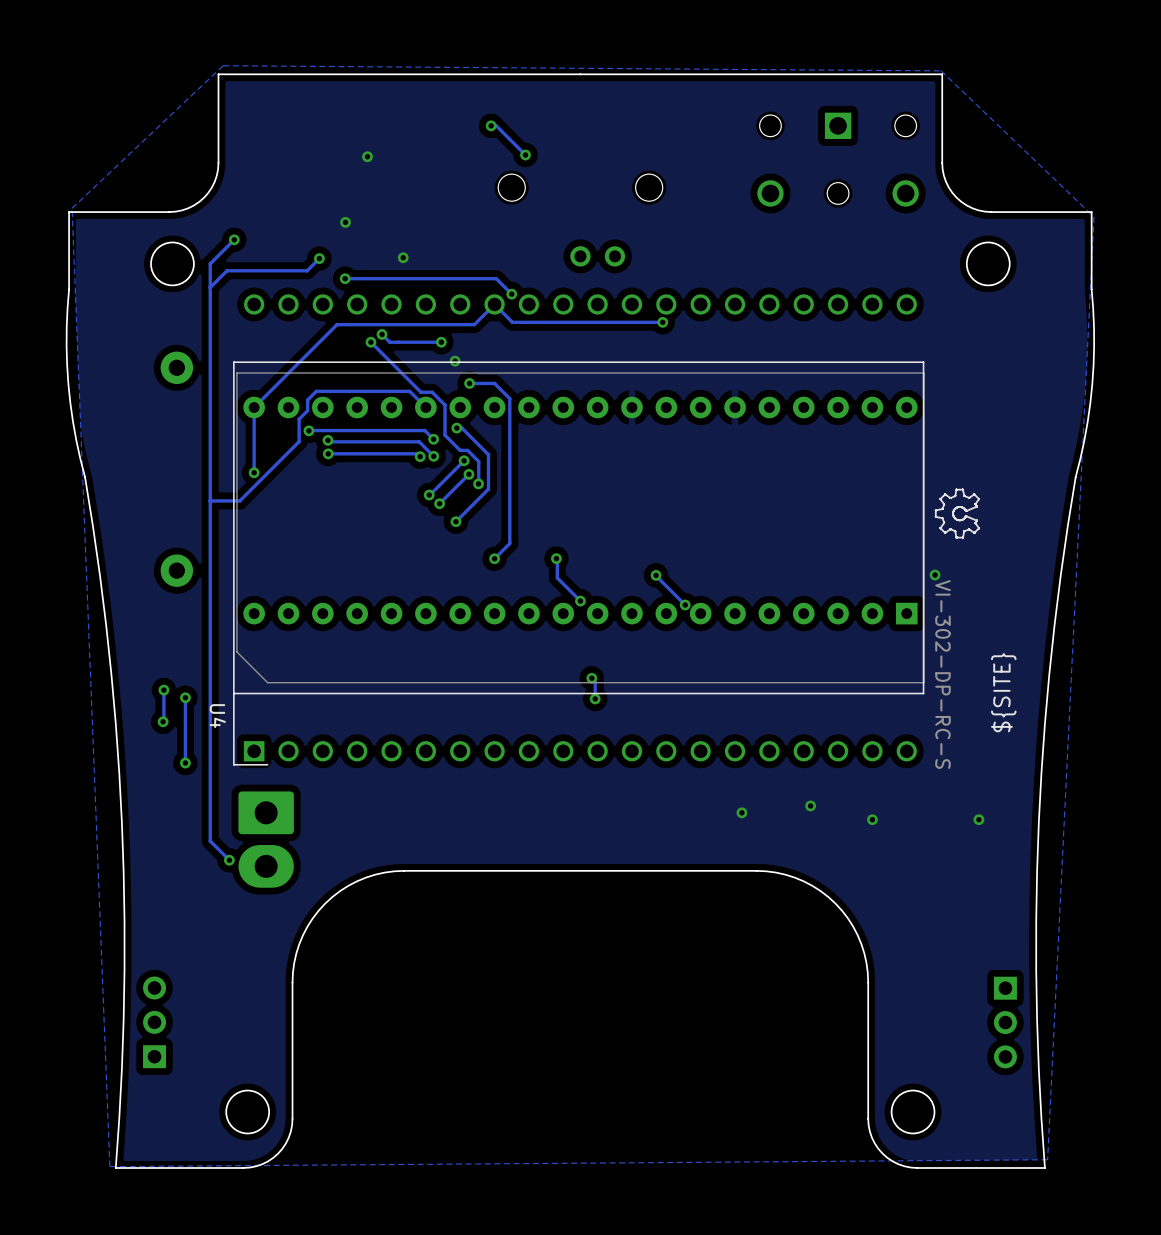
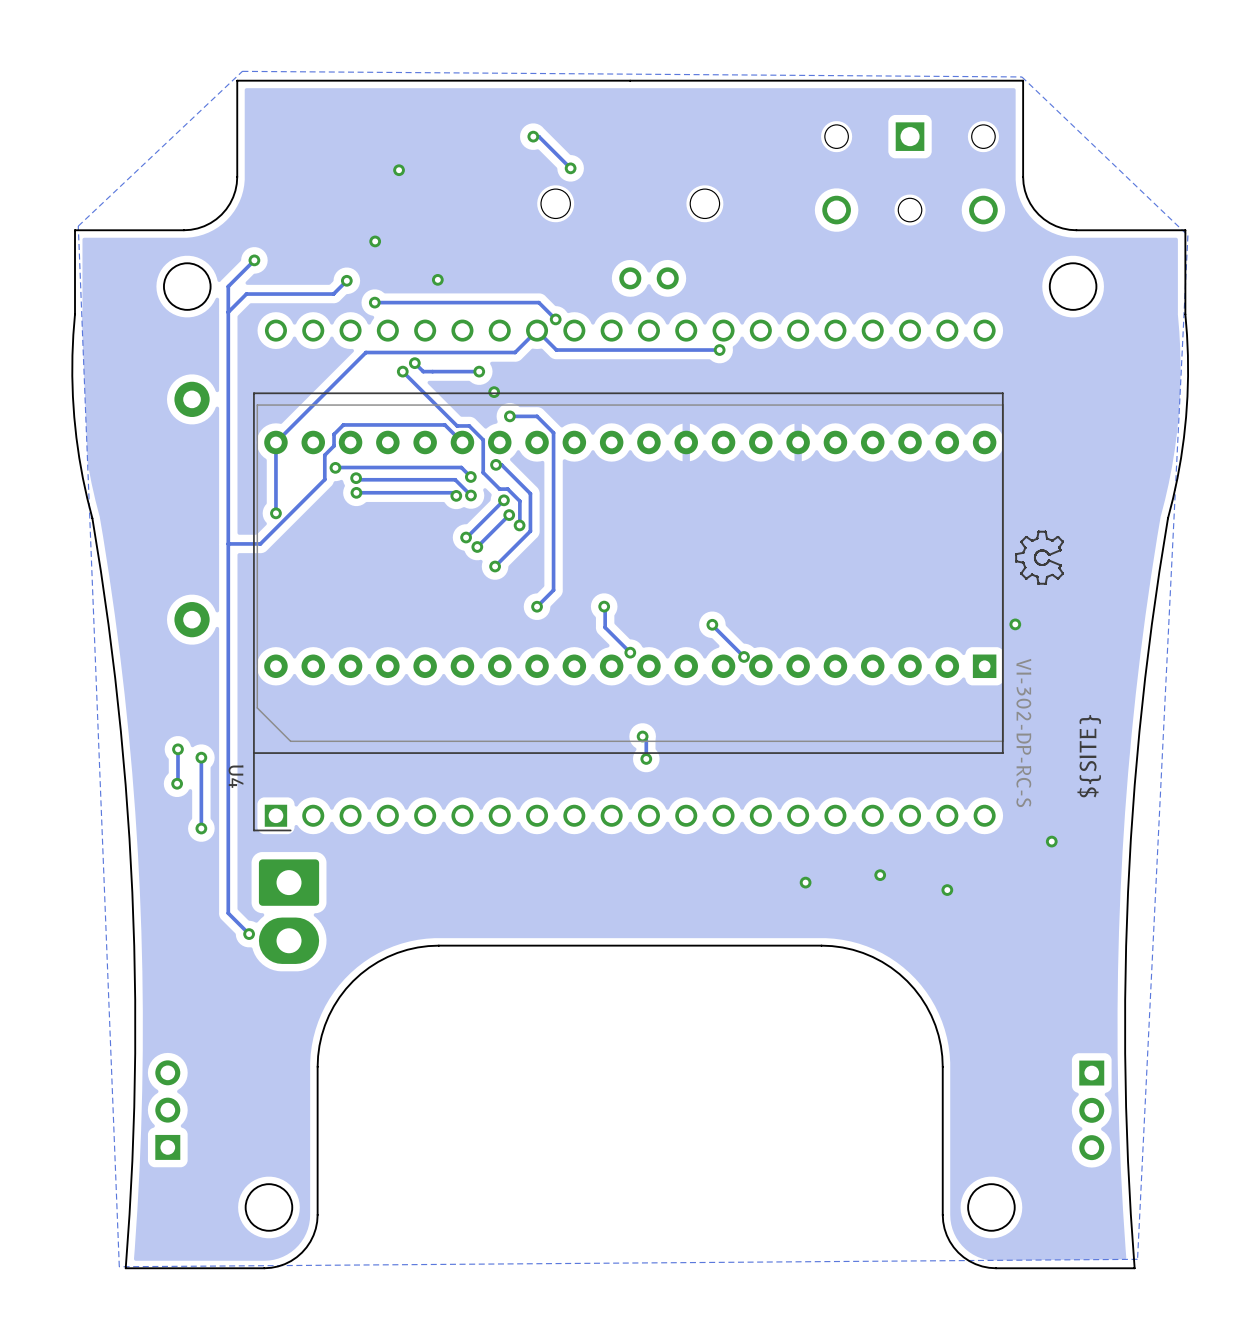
via position: (978, 819) -> (1051, 841)

